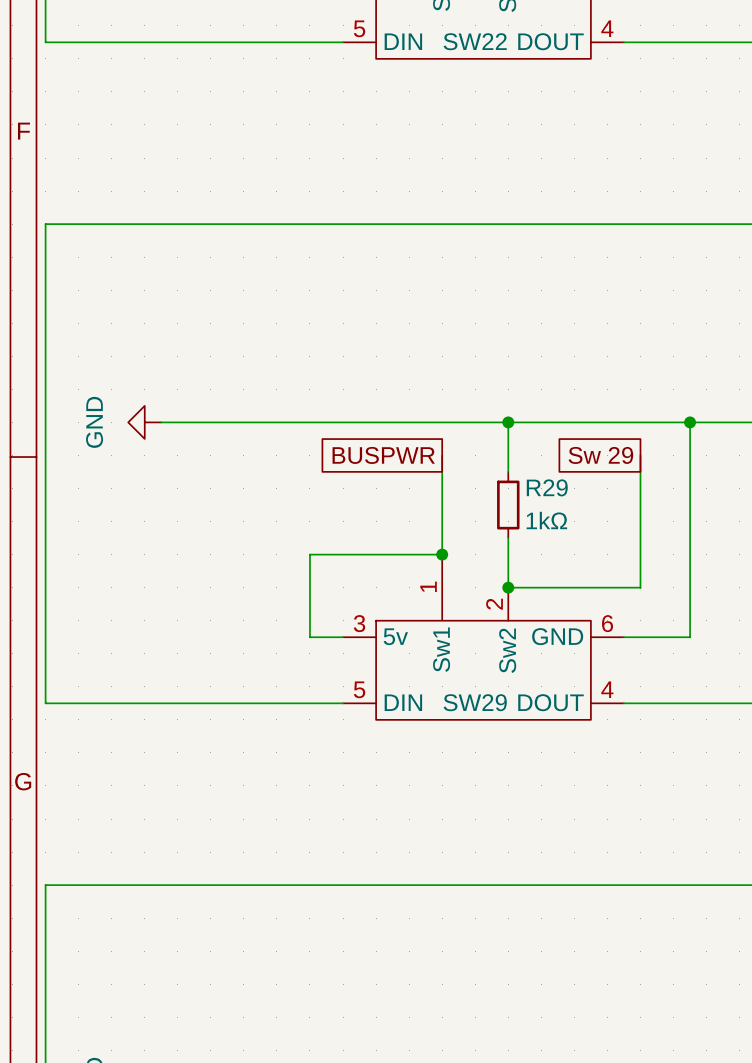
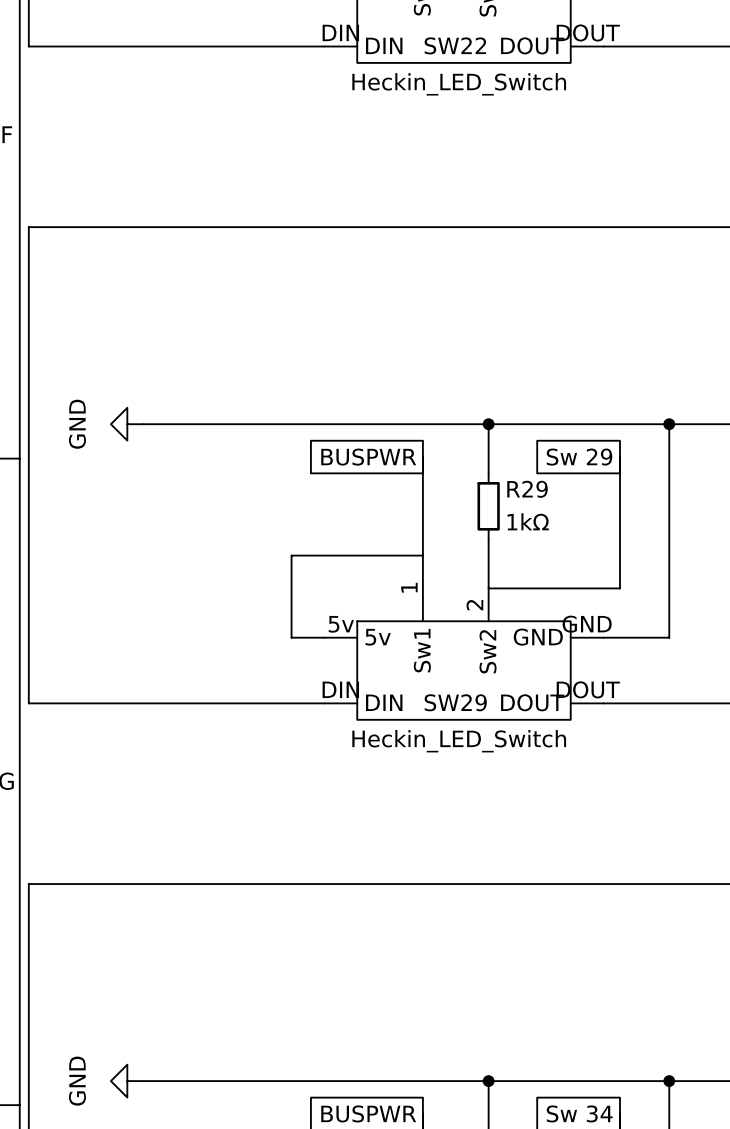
SW22 pin number: 5 (359, 28) -> DIN (340, 32)
SW22 pin number: 4 (607, 28) -> DOUT (588, 32)
SW22 value: none -> Heckin_LED_Switch (459, 84)
junction: (442, 554) -> none
junction: (508, 587) -> none
SW29 pin number: 3 (359, 623) -> 5v (341, 624)
SW29 pin number: 6 (607, 623) -> GND (587, 624)
SW29 pin number: 5 (359, 689) -> DIN (340, 689)
SW29 pin number: 4 (607, 689) -> DOUT (588, 689)
SW29 value: none -> Heckin_LED_Switch (459, 741)

